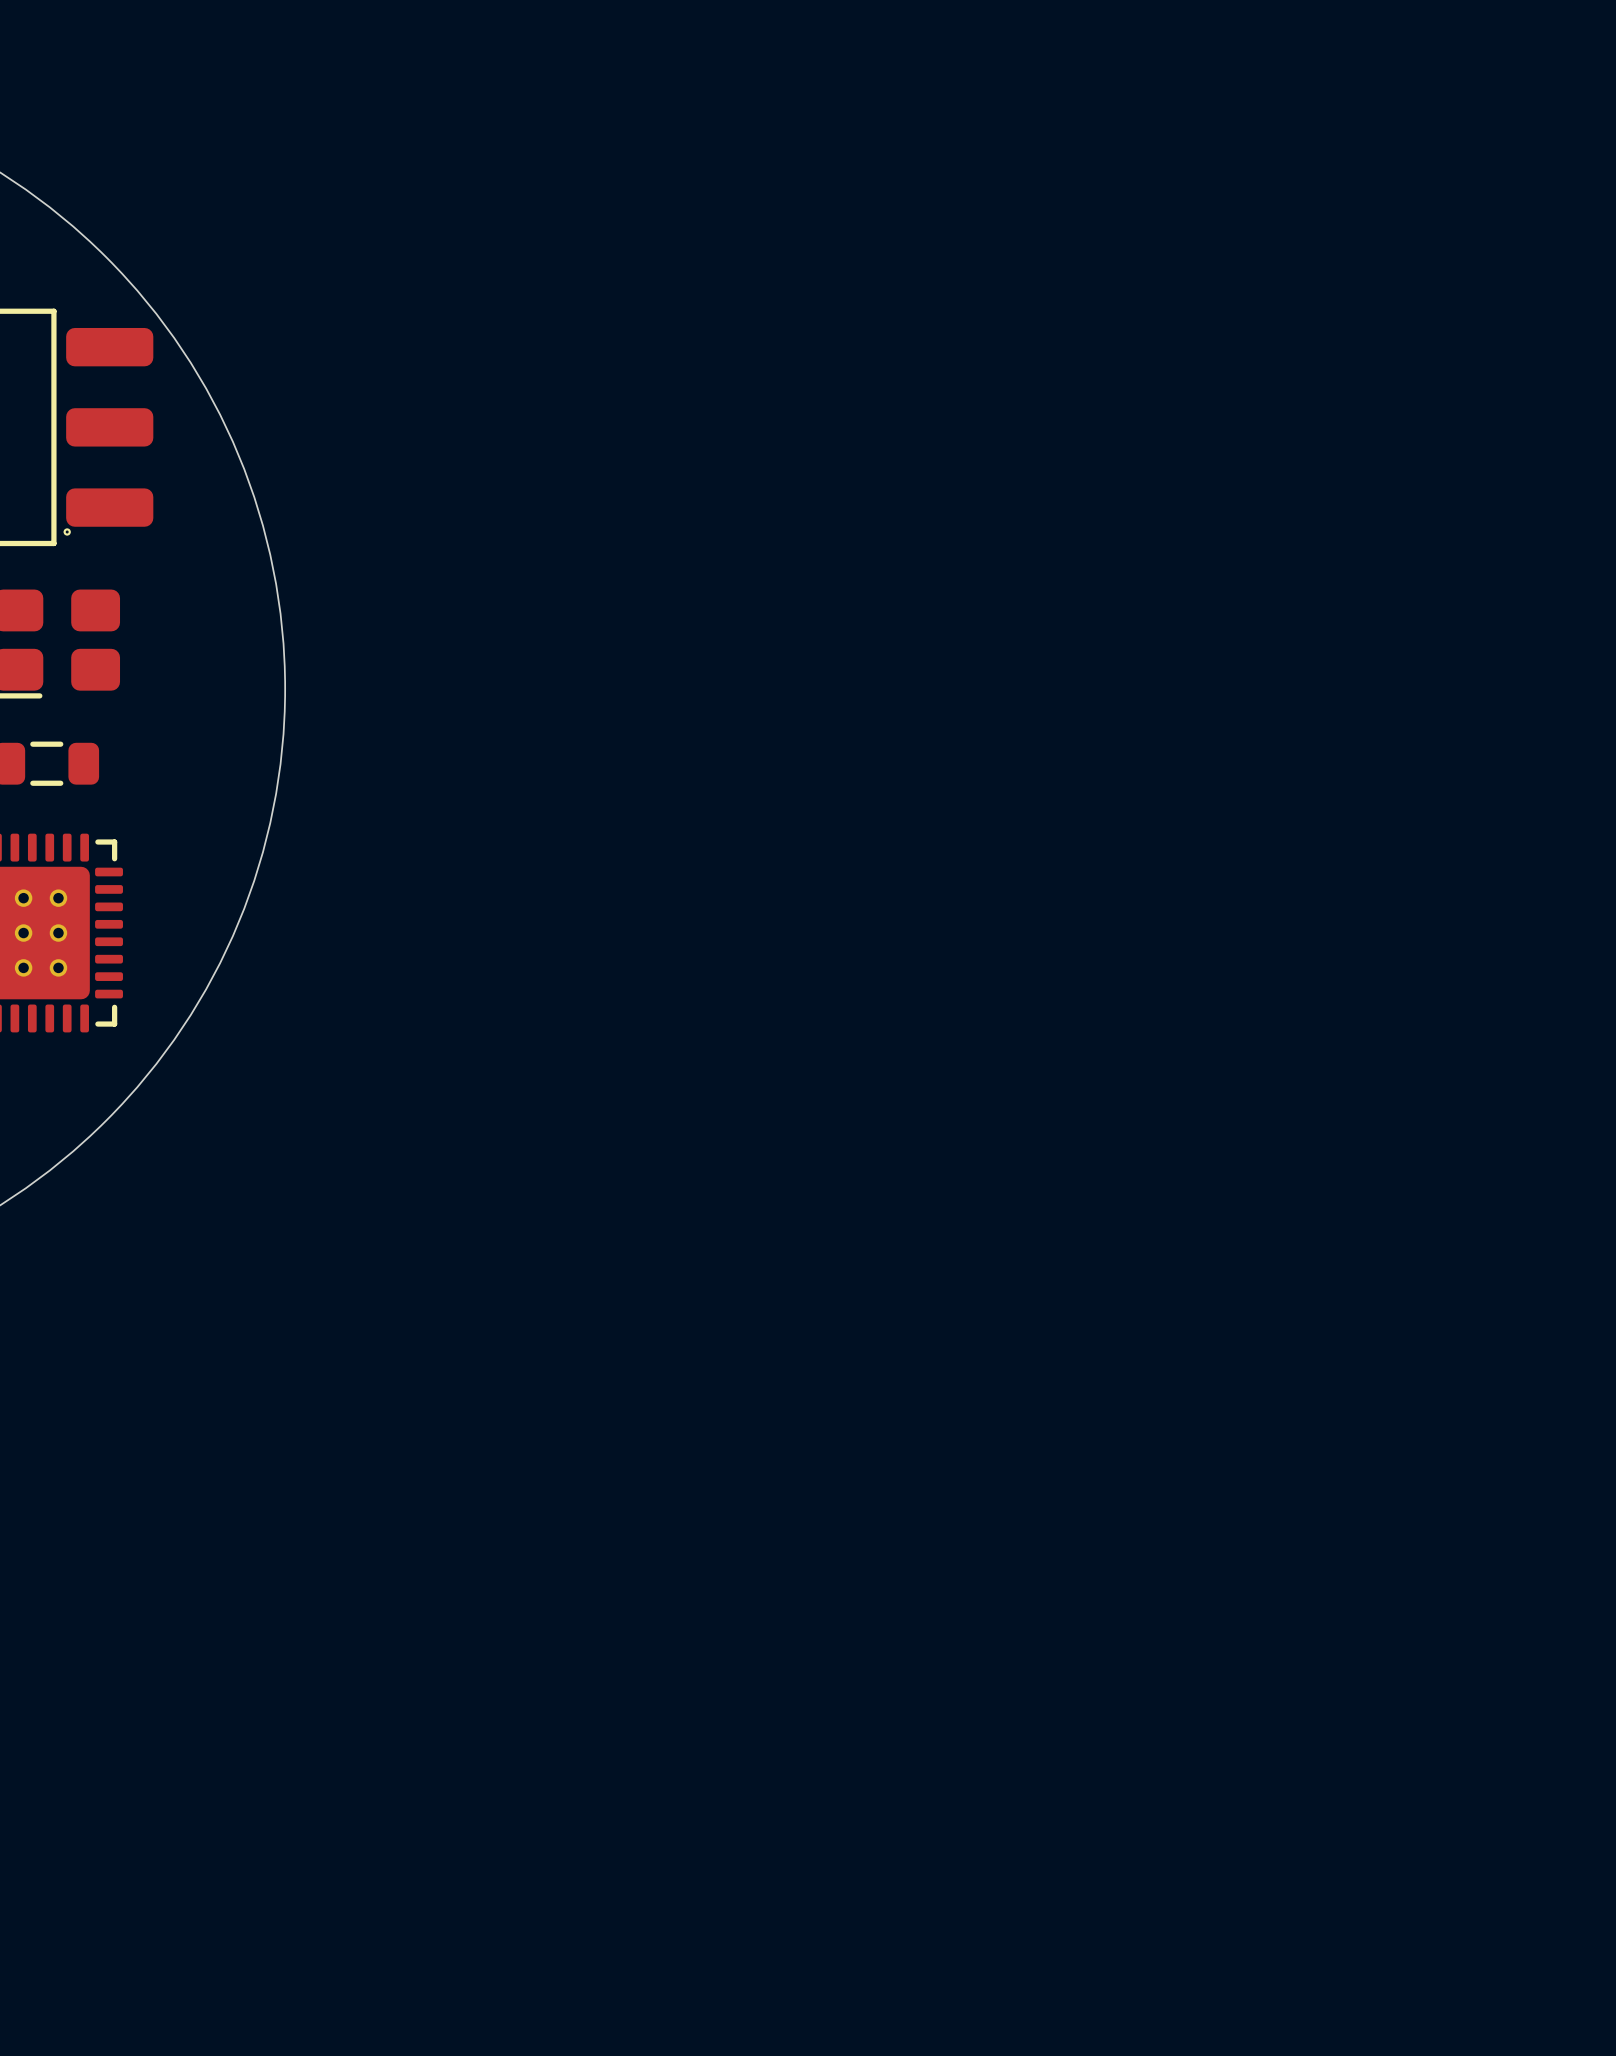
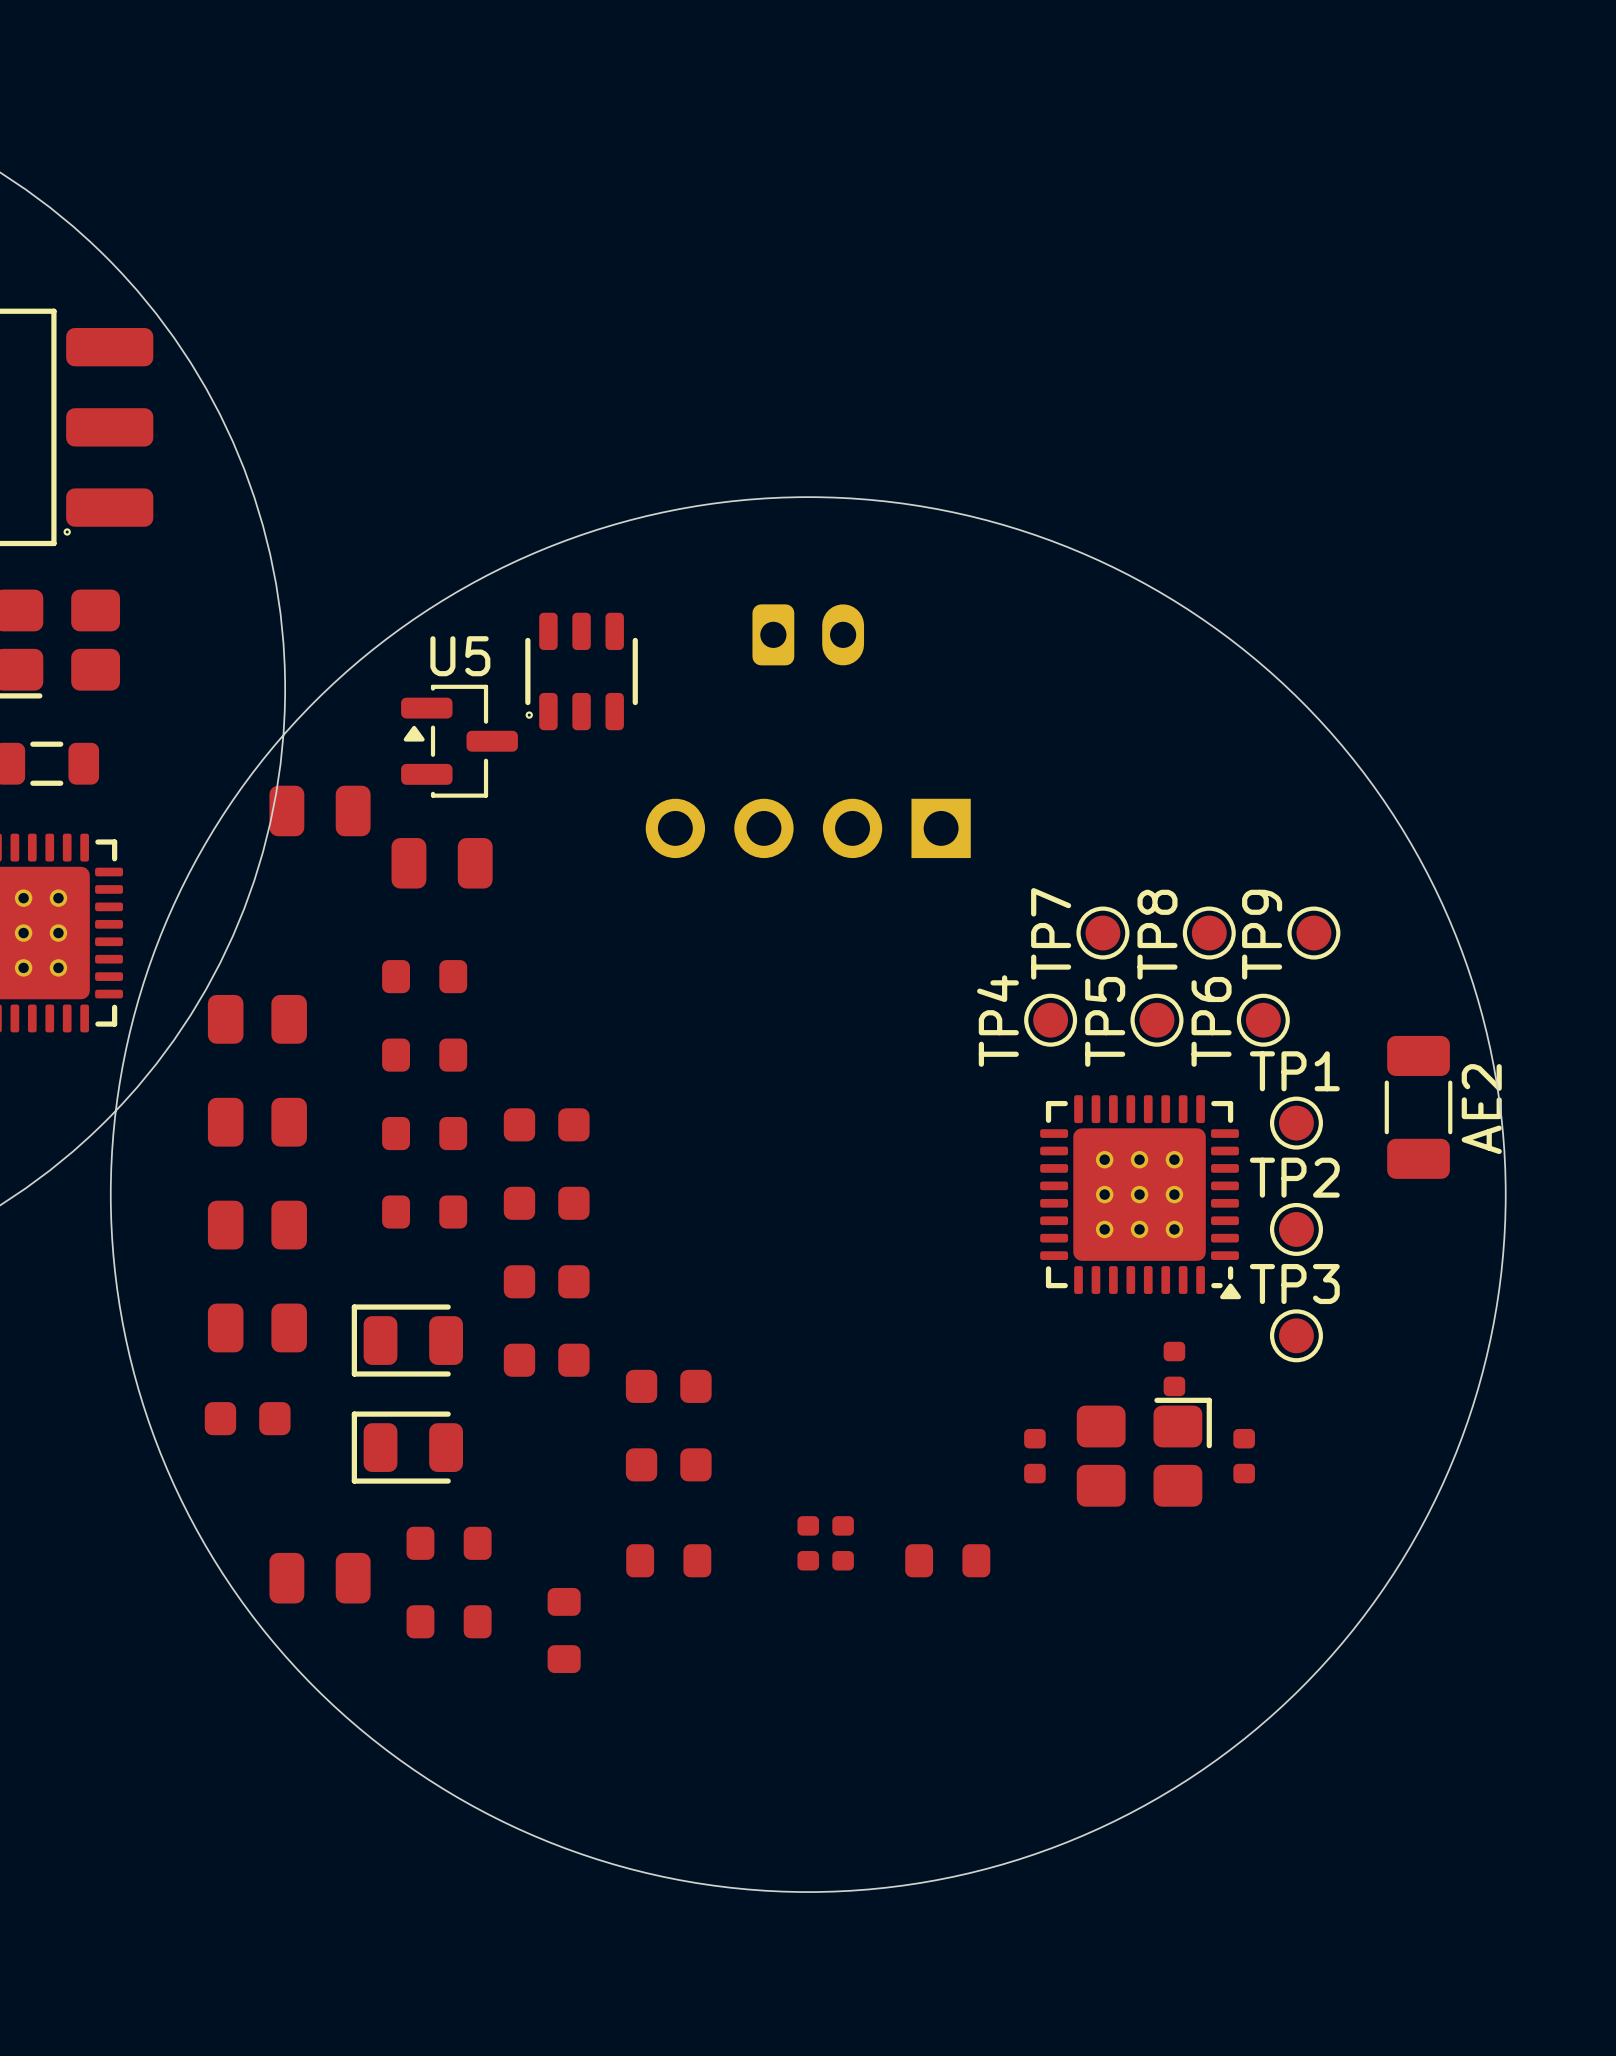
round board edge: none -> [109, 496, 1507, 1893]
part: none -> (808, 634)
part: none -> (581, 671)
U5: none -> (459, 741)
part: none -> (320, 810)
part: none -> (808, 828)
part: none -> (442, 863)
TP7: none -> (1102, 933)
TP8: none -> (1209, 933)
TP9: none -> (1313, 933)
part: none -> (424, 976)
part: none -> (257, 1019)
TP4: none -> (1050, 1020)
TP5: none -> (1156, 1020)
TP6: none -> (1263, 1020)
part: none -> (424, 1055)
AE2: none -> (1418, 1107)
part: none -> (257, 1122)
TP1: none -> (1296, 1123)
part: none -> (546, 1124)
part: none -> (424, 1133)
part: none -> (1140, 1197)
part: none -> (546, 1203)
part: none -> (424, 1212)
part: none -> (257, 1225)
TP2: none -> (1296, 1229)
part: none -> (546, 1281)
part: none -> (257, 1327)
TP3: none -> (1296, 1335)
part: none -> (407, 1340)
part: none -> (546, 1360)
part: none -> (1174, 1368)
part: none -> (668, 1386)
part: none -> (247, 1418)
part: none -> (407, 1447)
part: none -> (1144, 1452)
part: none -> (1034, 1456)
part: none -> (1244, 1456)
part: none -> (668, 1464)
part: none -> (449, 1543)
part: none -> (808, 1543)
part: none -> (843, 1543)
part: none -> (668, 1560)
part: none -> (947, 1560)
part: none -> (320, 1578)
part: none -> (449, 1621)
part: none -> (564, 1630)

